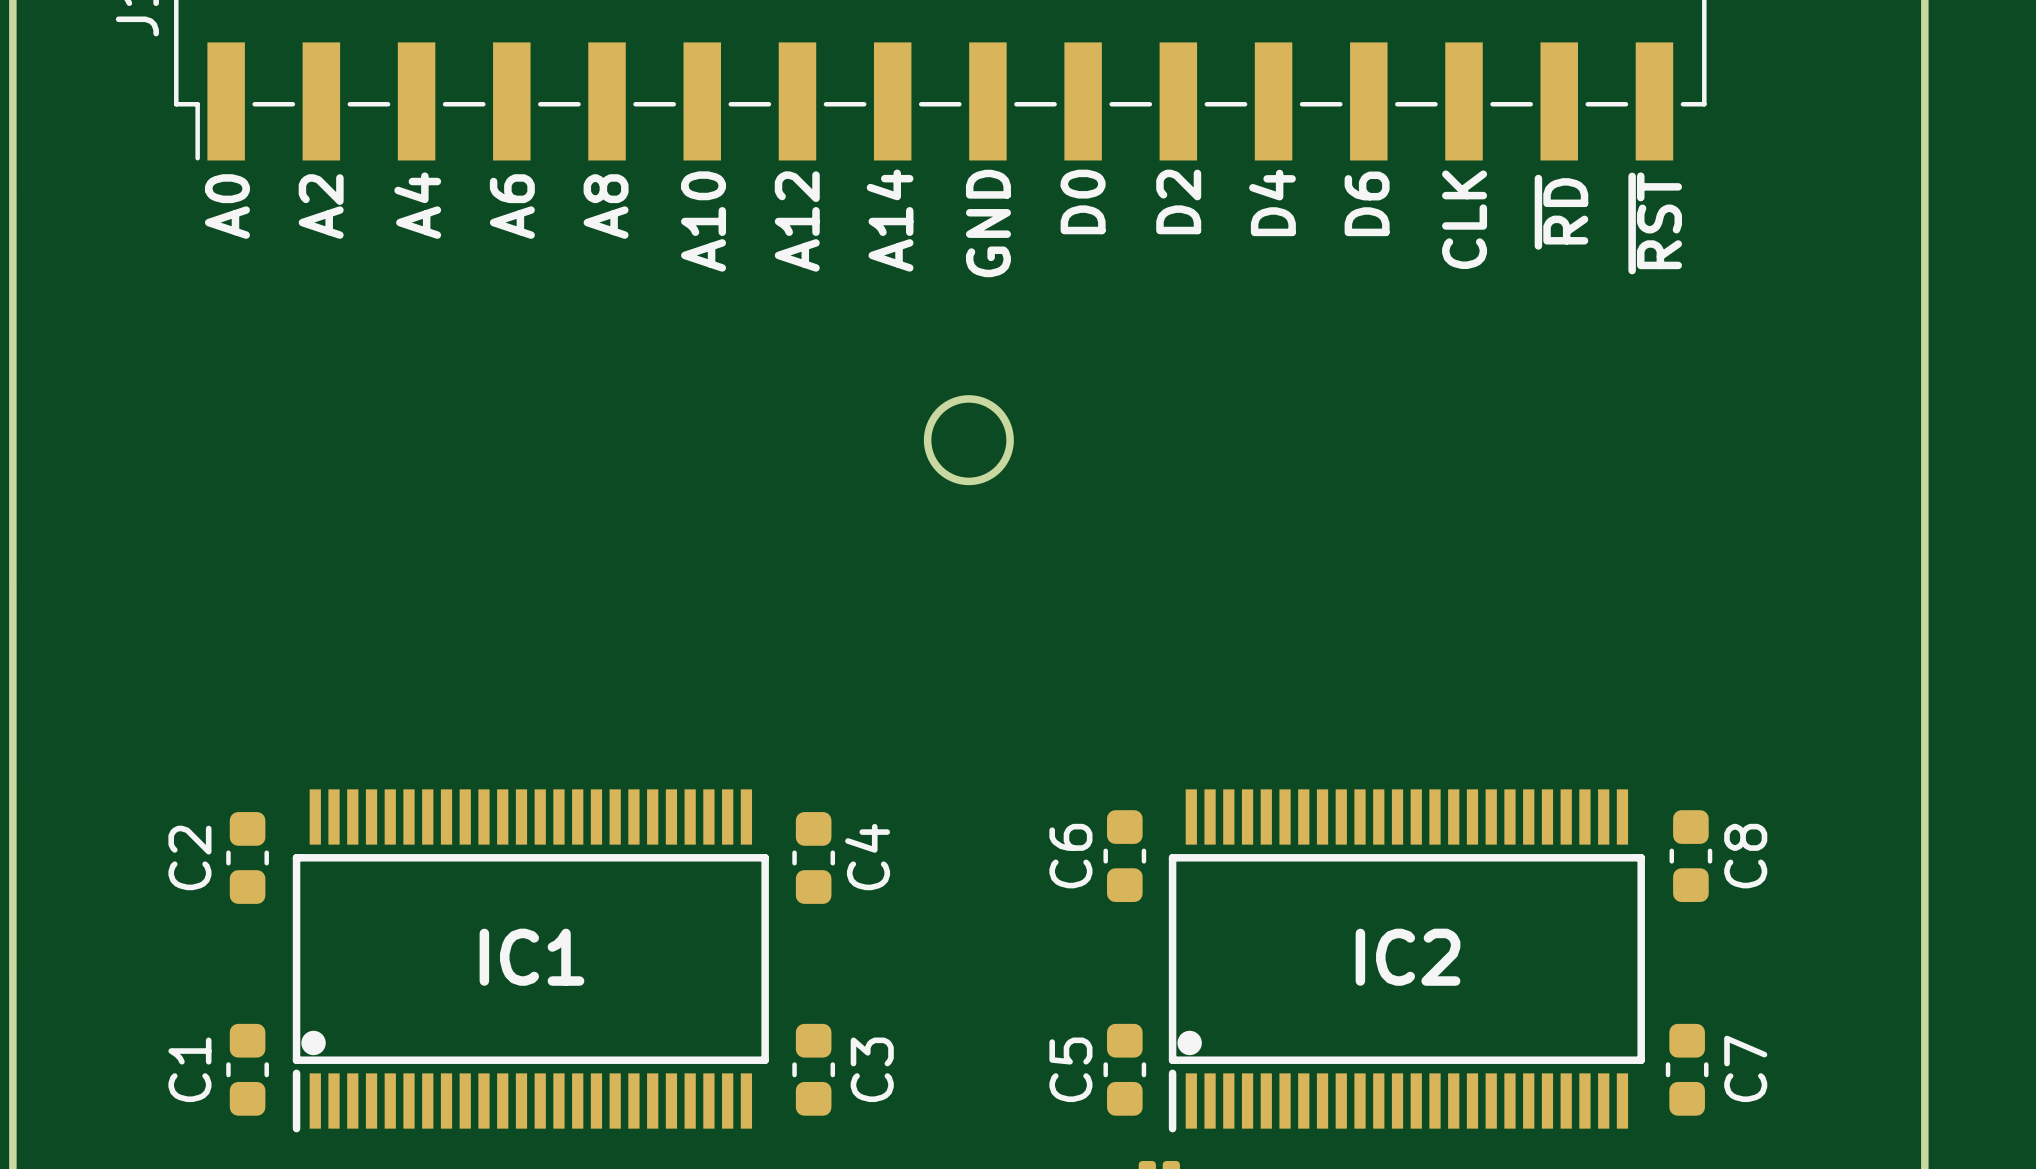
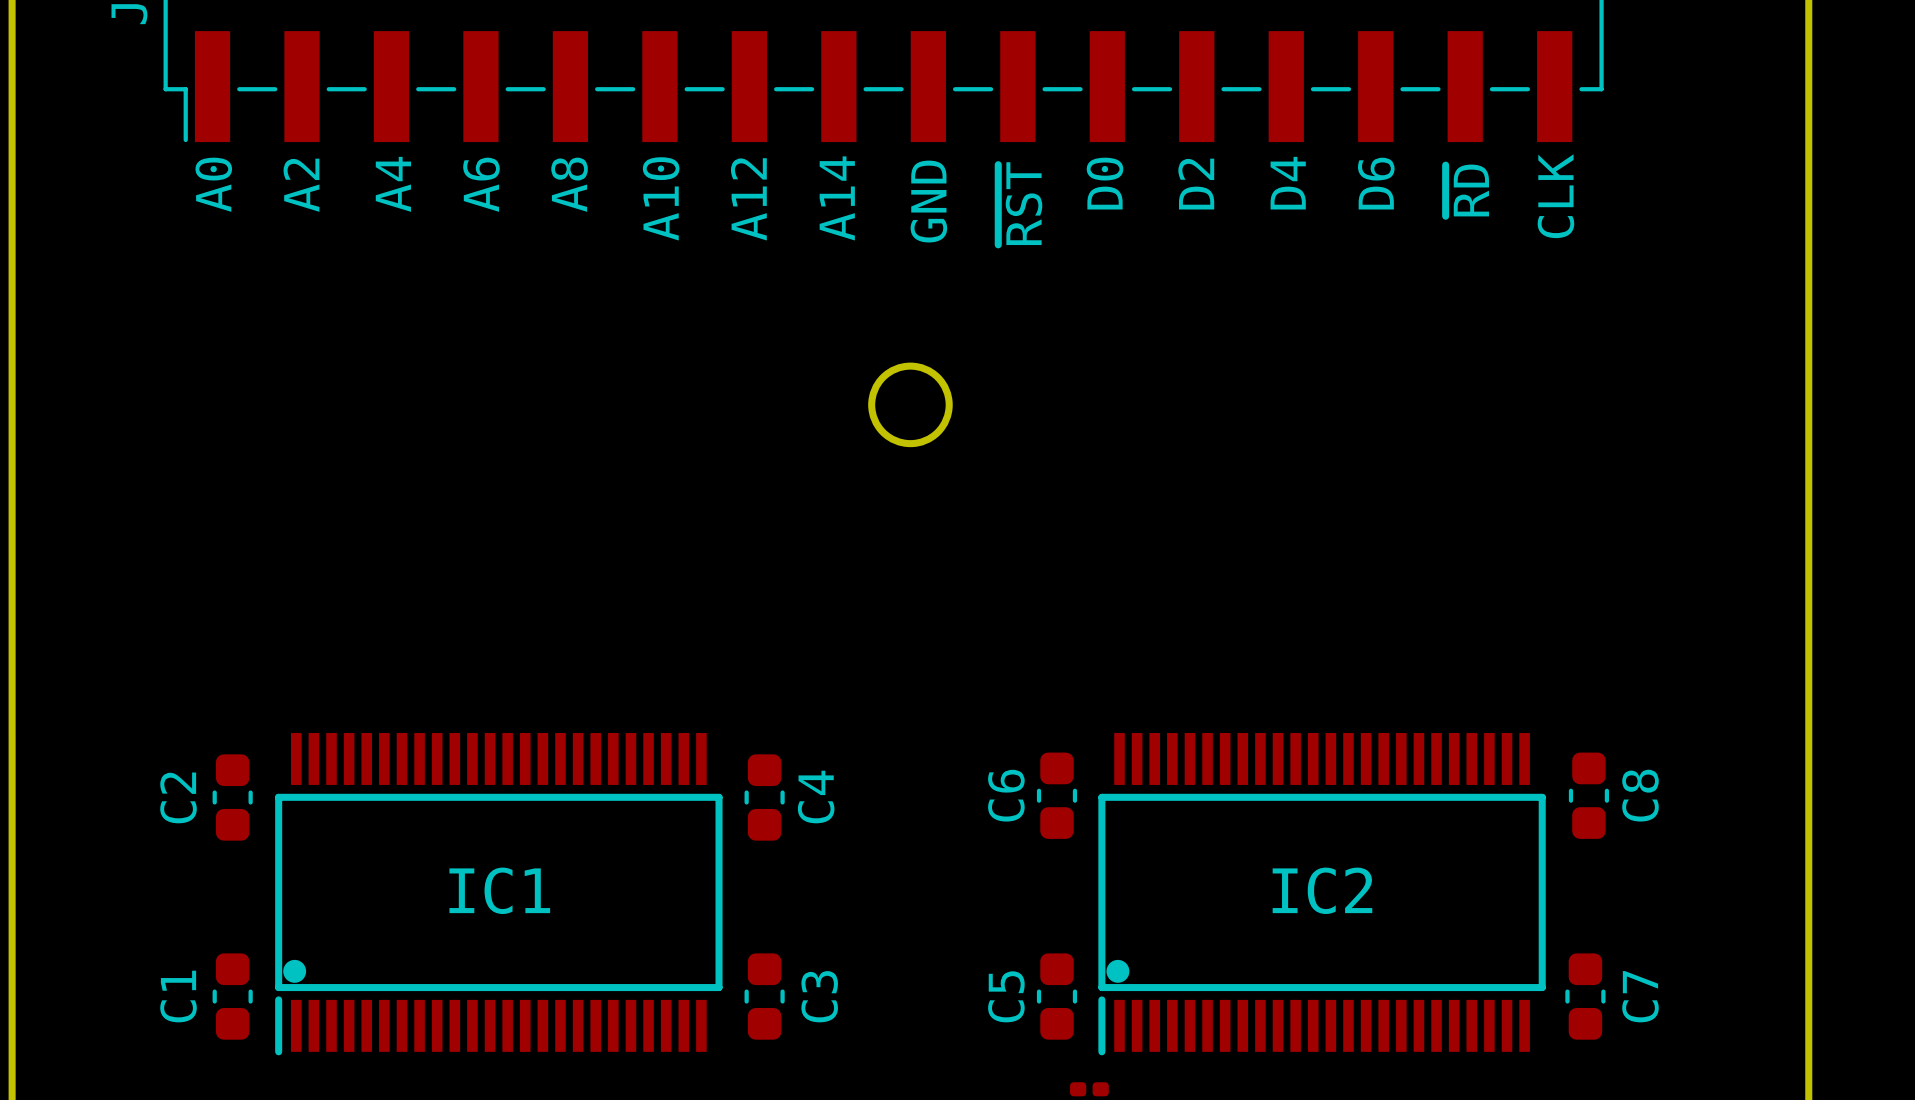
text: D0 (1083, 201) -> ~{RST} (1020, 203)
text: D2 (1178, 201) -> D0 (1105, 183)
text: D4 (1272, 202) -> D2 (1196, 184)
text: D6 (1367, 203) -> D4 (1288, 183)
text: CLK (1464, 219) -> D6 (1376, 183)
text: ~{RST} (1655, 223) -> CLK (1555, 196)

